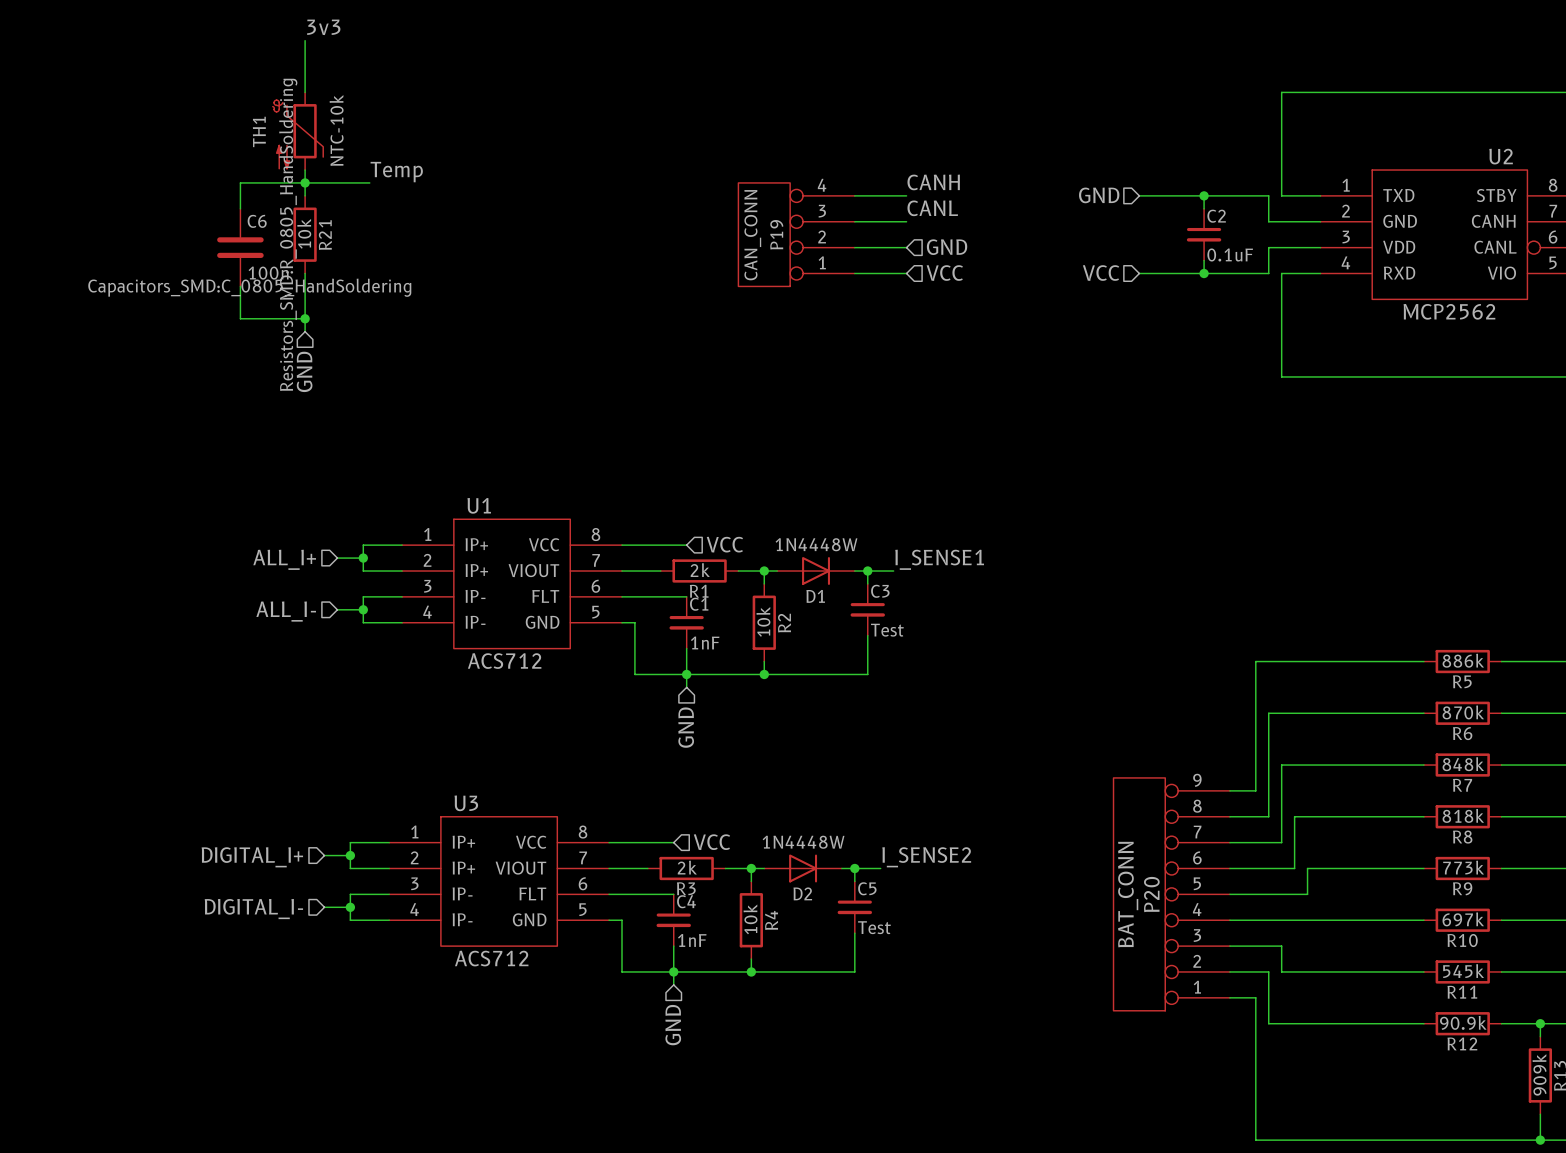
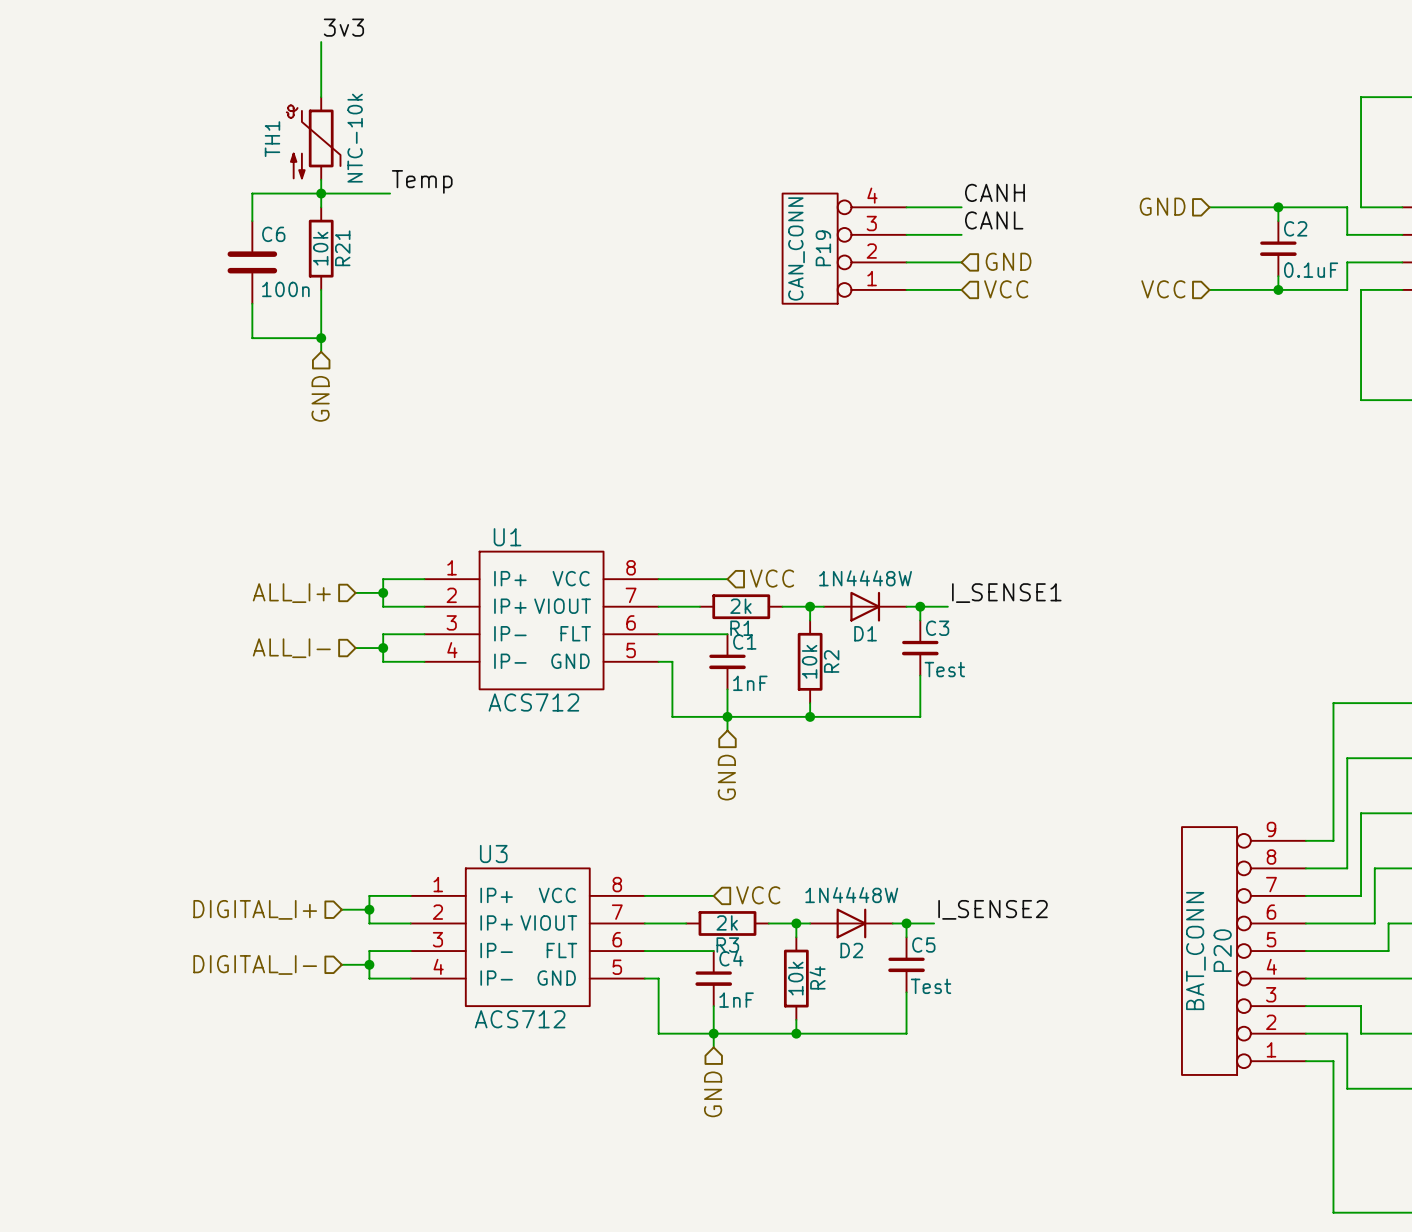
R21 text: Resistors_SMD:R_0805_HandSoldering (288, 234) -> none
C6 text: Capacitors_SMD:C_0805_HandSoldering (249, 287) -> none

